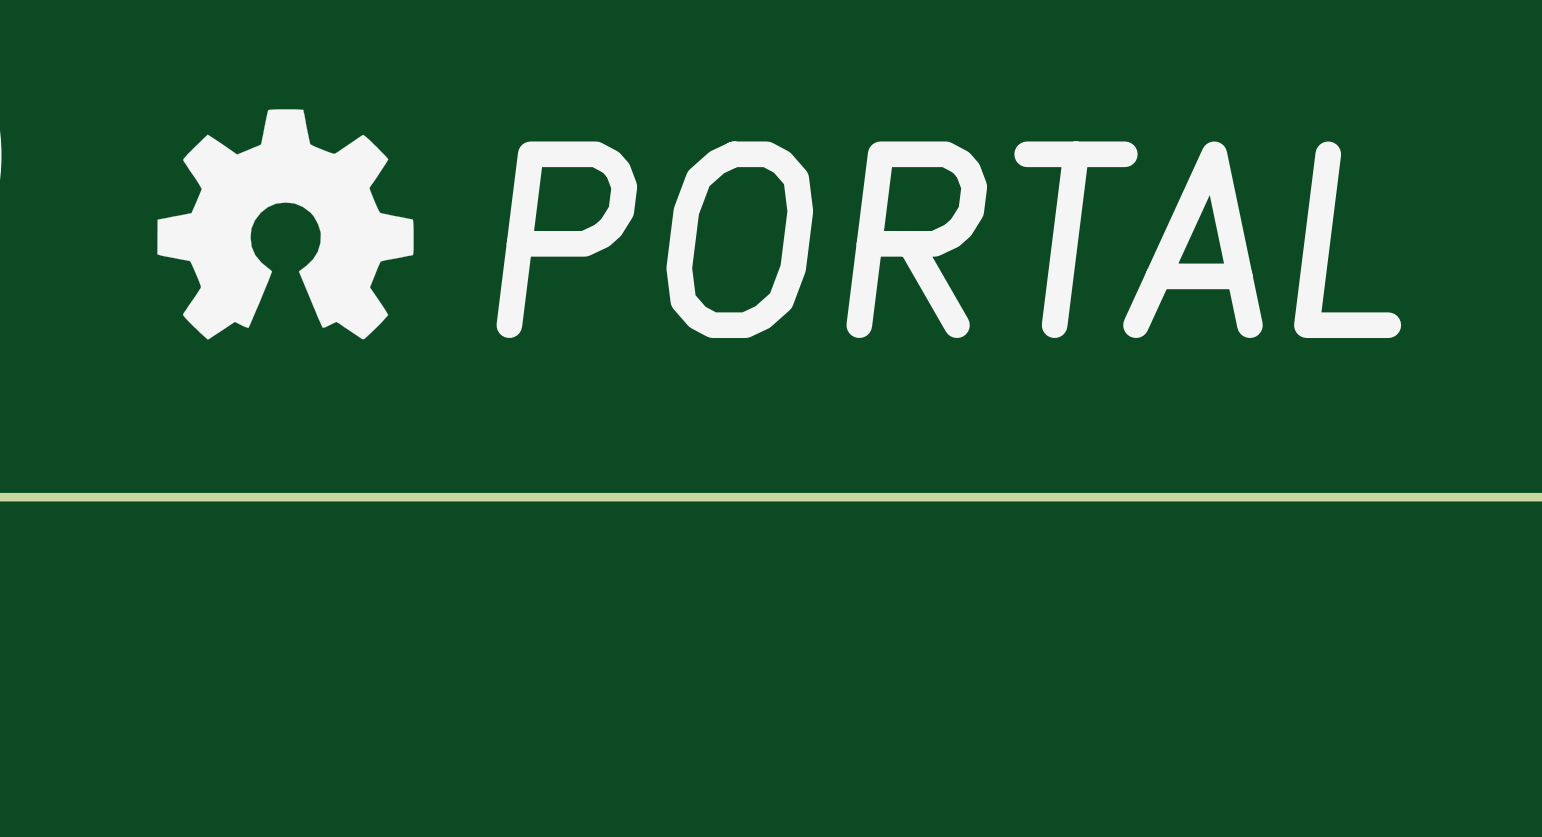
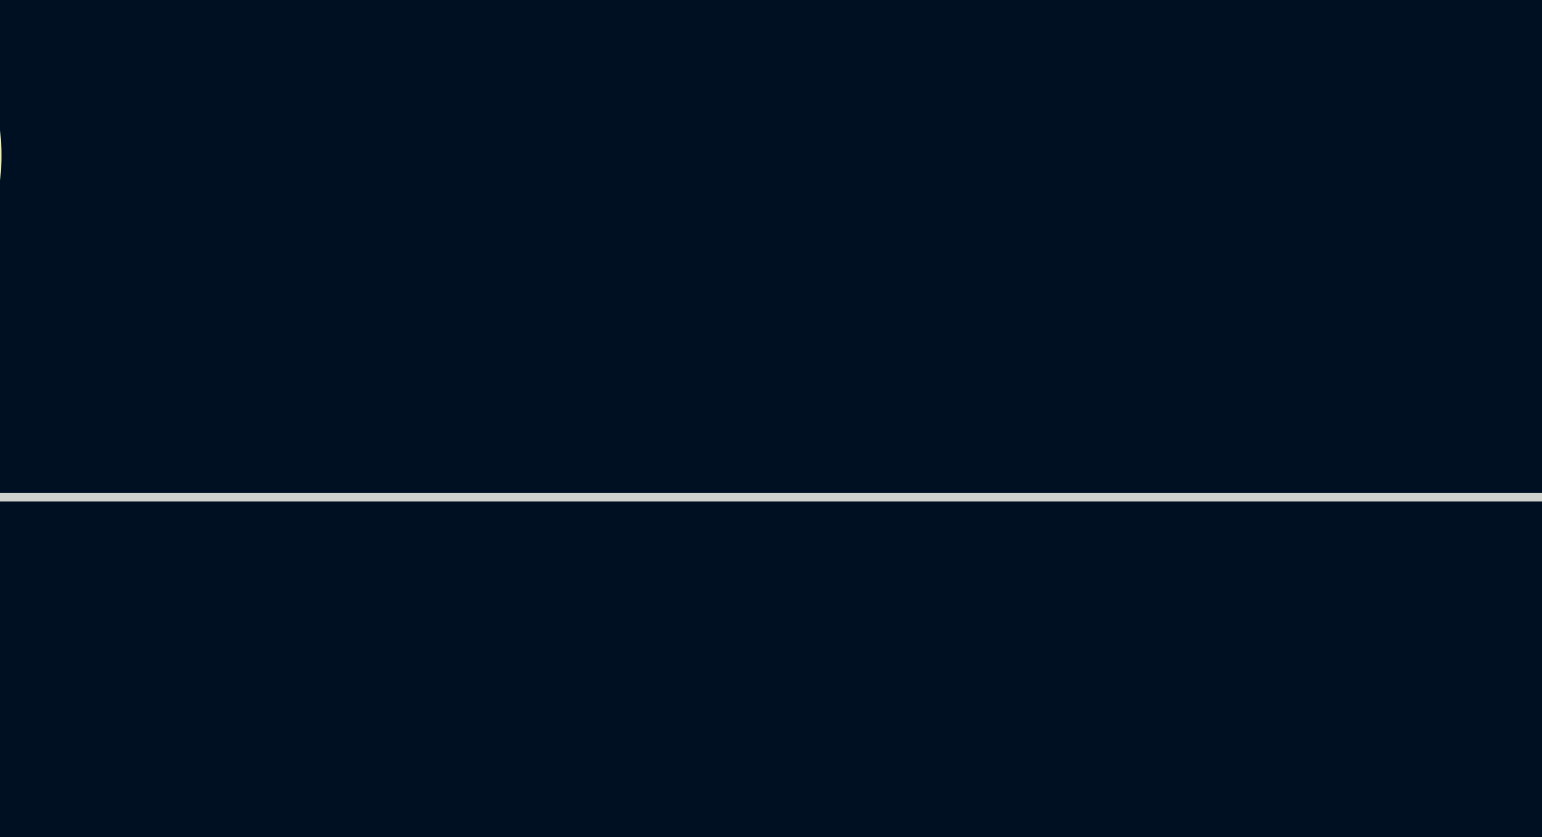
drawing: [157, 109, 414, 340] -> none
text: PORTAL (948, 239) -> none

